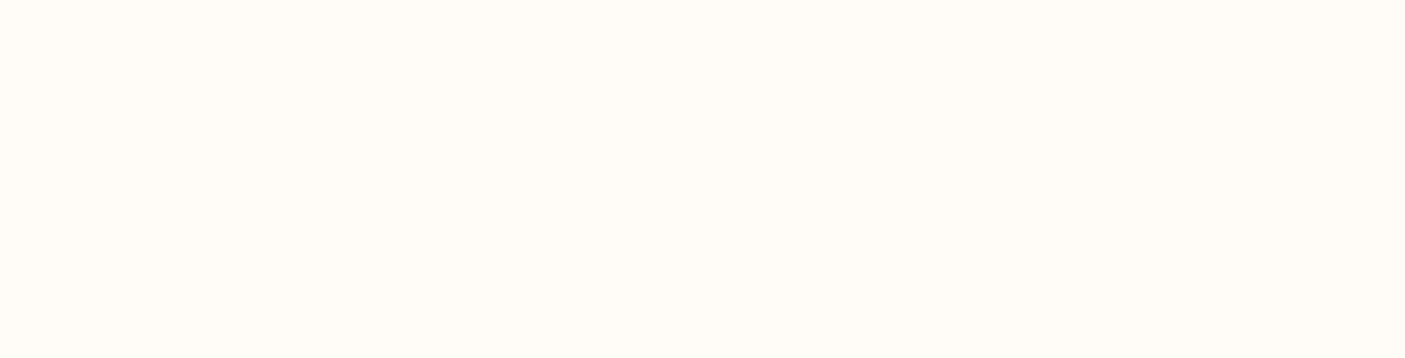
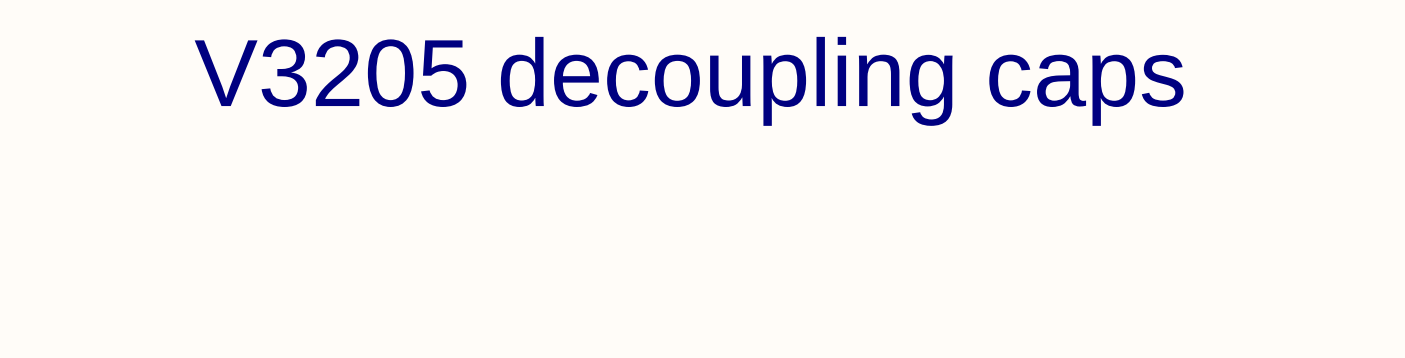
text: none -> V3205 decoupling caps (689, 81)

